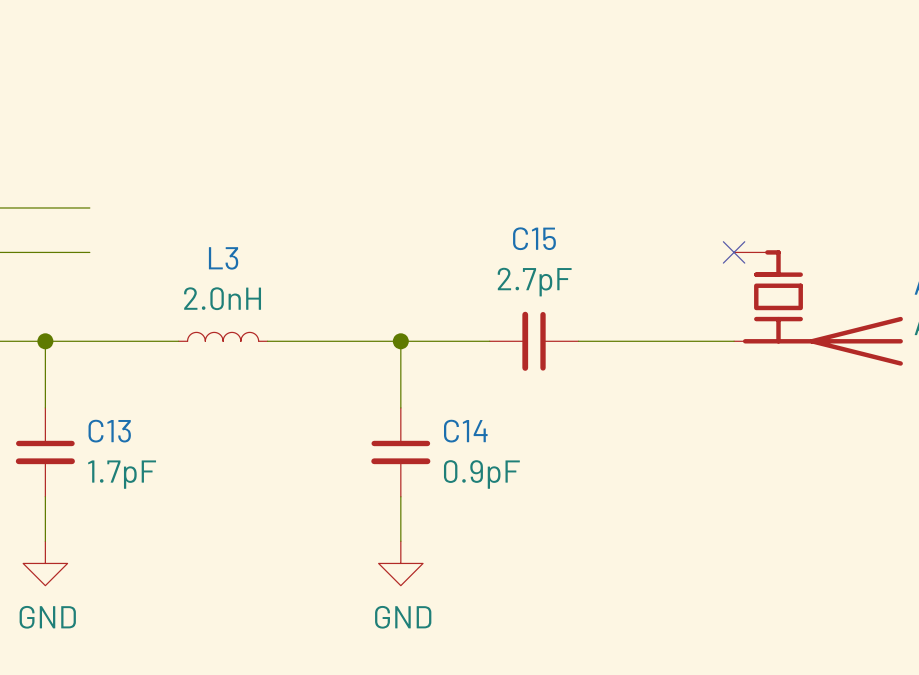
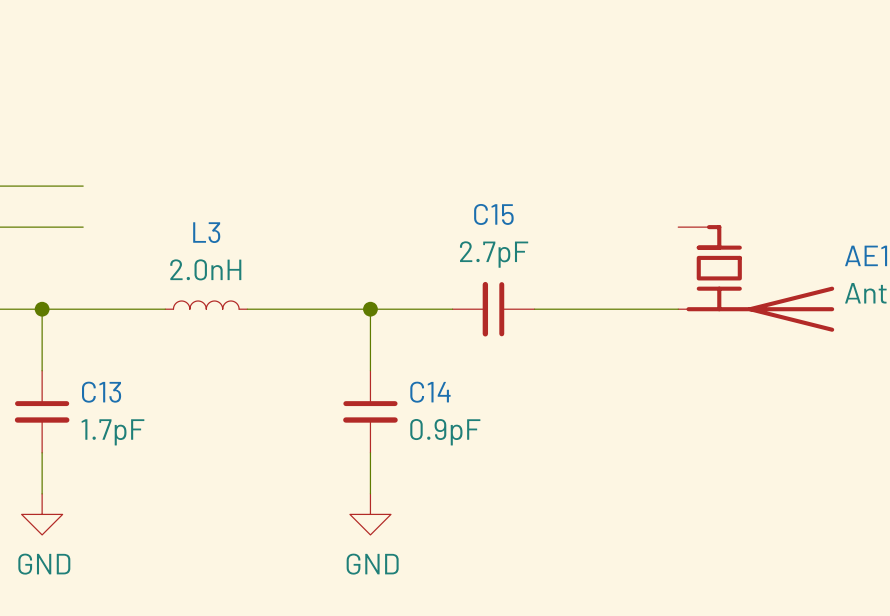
no-connect mark: (734, 252) -> none

